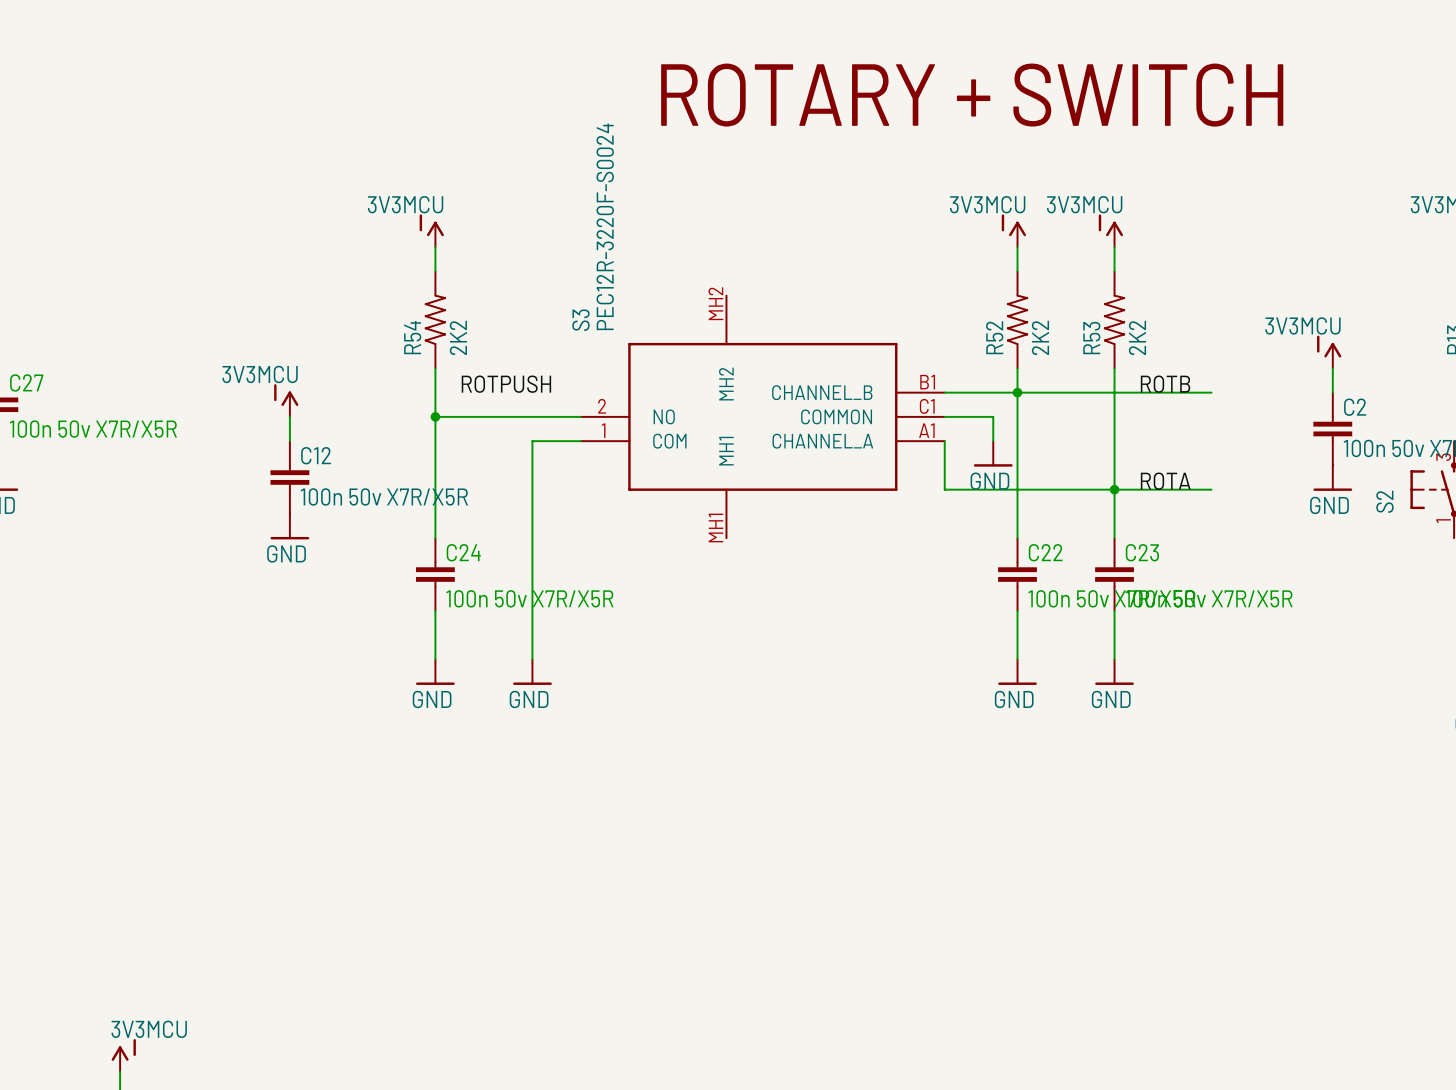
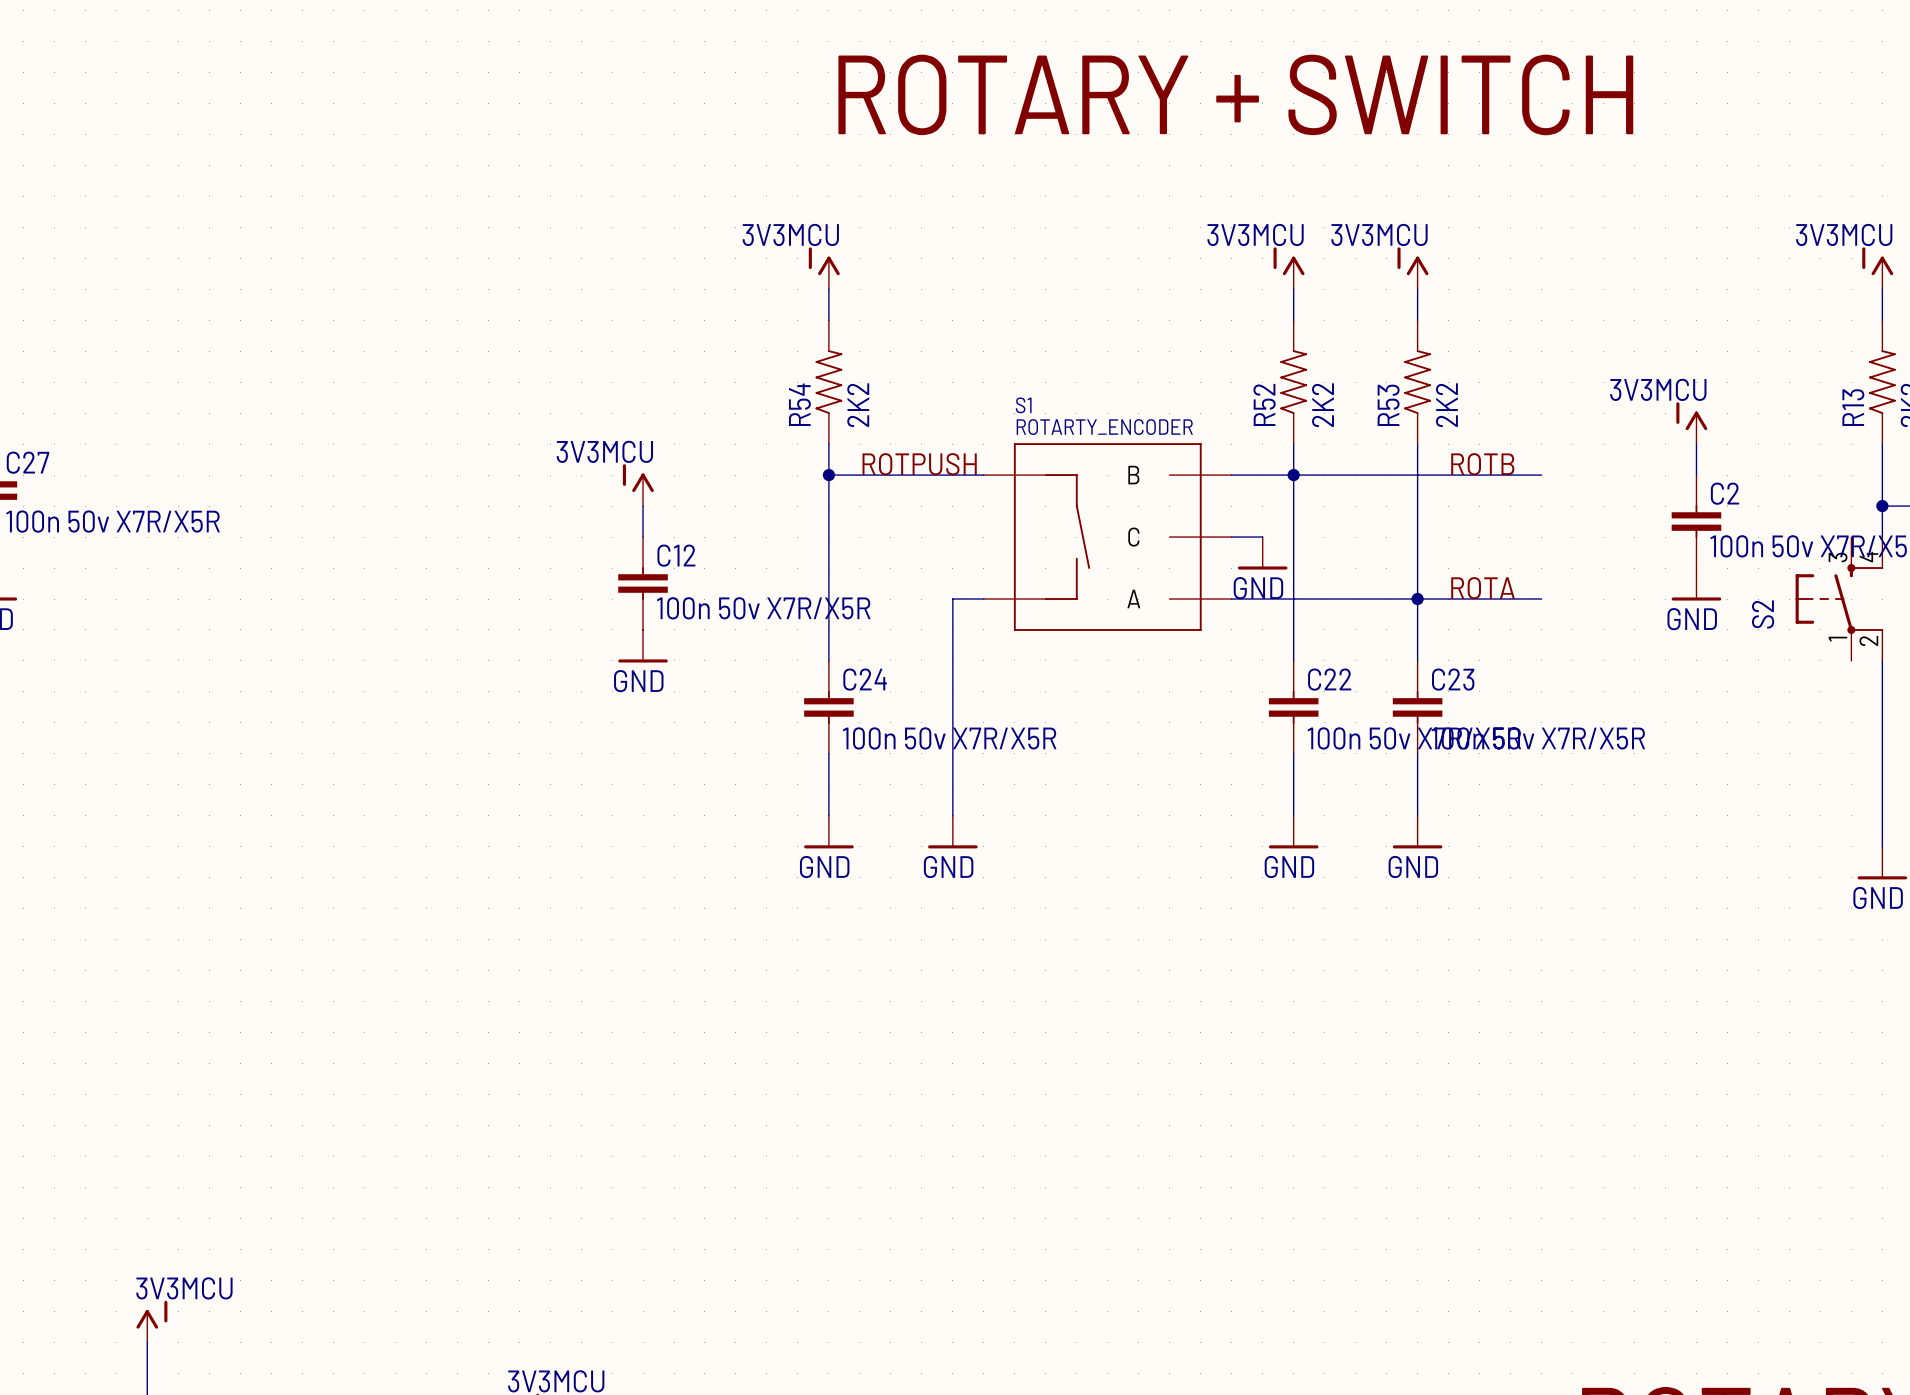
power symbol: 3V3MCU (431, 230) -> none
power symbol: none -> 3V3MCU (824, 268)
wire: (435, 247) (435, 271) -> (828, 289) (828, 320)
R54 position: (435, 319) -> (828, 382)
wire: (435, 368) (435, 538) -> (828, 444) (828, 660)
label position: ROTPUSH (506, 384) -> ROTPUSH (919, 464)
wire: none -> (828, 475) (983, 475)
junction: none -> (828, 475)
power symbol: 3V3MCU (286, 400) -> none
power symbol: none -> 3V3MCU (638, 485)
wire: (289, 416) (289, 441) -> (643, 506) (643, 537)
wire: (435, 416) (580, 416) -> none
junction: (435, 416) -> none
S3: PEC12R-3220F-S0024 (762, 416) -> none
wire: (944, 416) (993, 416) (993, 441) -> (1231, 537) (1262, 537)
wire: (580, 441) (532, 441) (532, 659) -> none
S1: none -> ROTARTY_ENCODER (1107, 537)
C12 position: (289, 477) -> (643, 583)
wire: none -> (983, 599) (952, 599) (952, 815)
power symbol: GND (289, 526) -> none
power symbol: none -> GND (643, 646)
C24 position: (435, 574) -> (828, 707)
wire: (435, 610) (435, 659) -> (828, 753) (828, 815)
power symbol: GND (435, 672) -> none
power symbol: GND (532, 672) -> none
power symbol: none -> GND (828, 832)
power symbol: none -> GND (952, 832)

